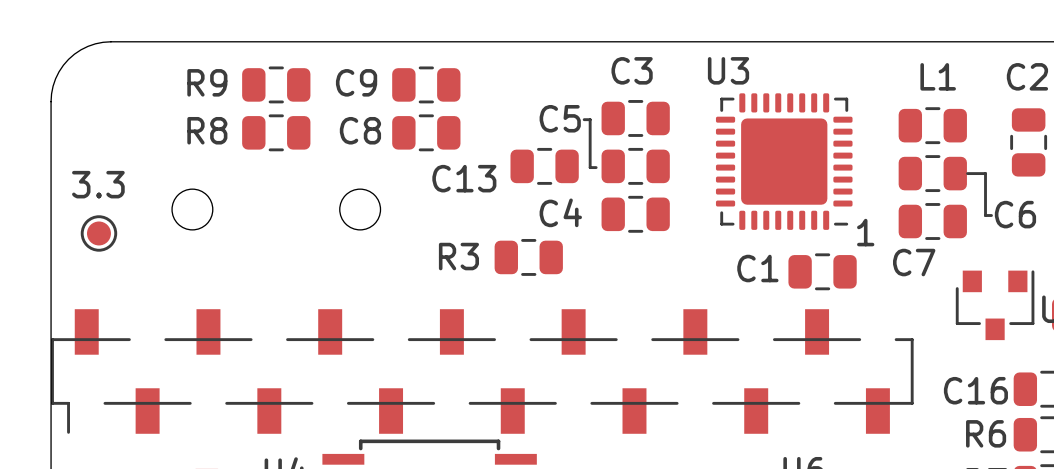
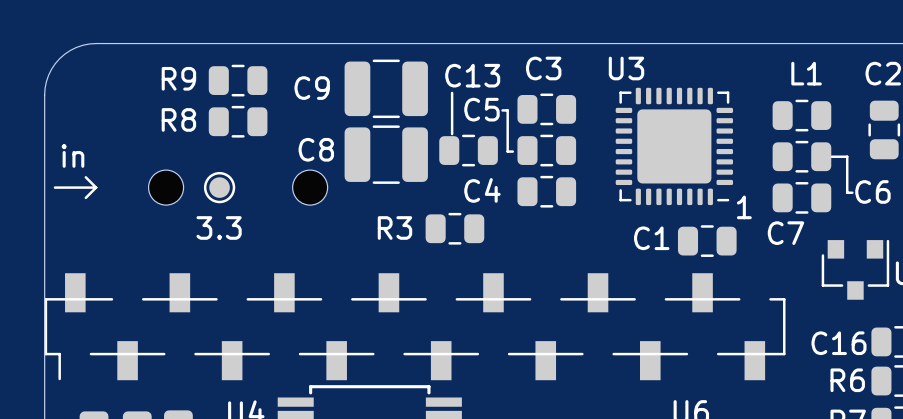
C9 footprint: [392, 66, 461, 104] -> [344, 59, 428, 119]
line: none -> (452, 92) (452, 134)
C8 footprint: [392, 114, 461, 152] -> [344, 125, 428, 184]
text: none -> in (72, 155)
C13 name position: C13 (464, 178) -> C13 (472, 75)
text position: 3.3 (98, 184) -> 3.3 (219, 227)
line: none -> (85, 177) (96, 187)
line: none -> (54, 187) (96, 187)
line: none -> (96, 187) (85, 197)
part position: (98, 233) -> (219, 187)

